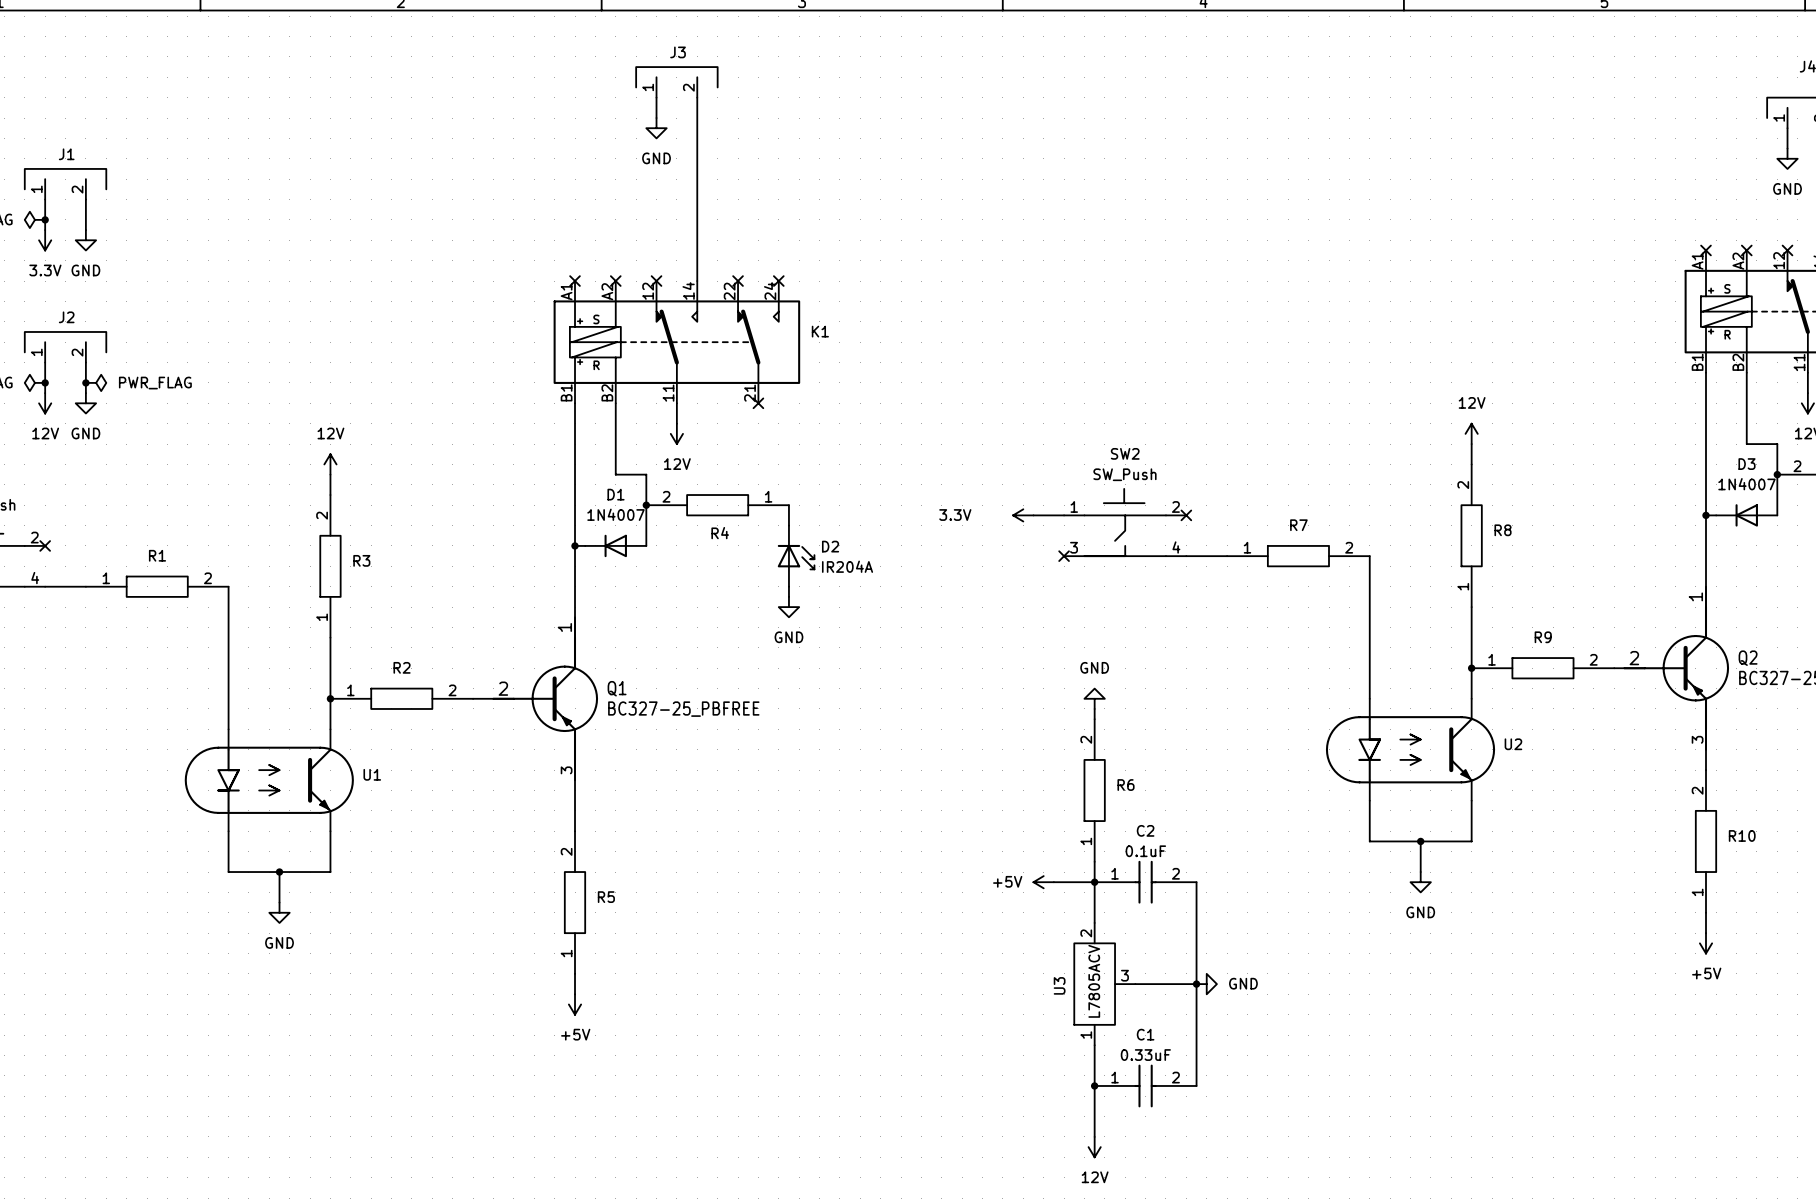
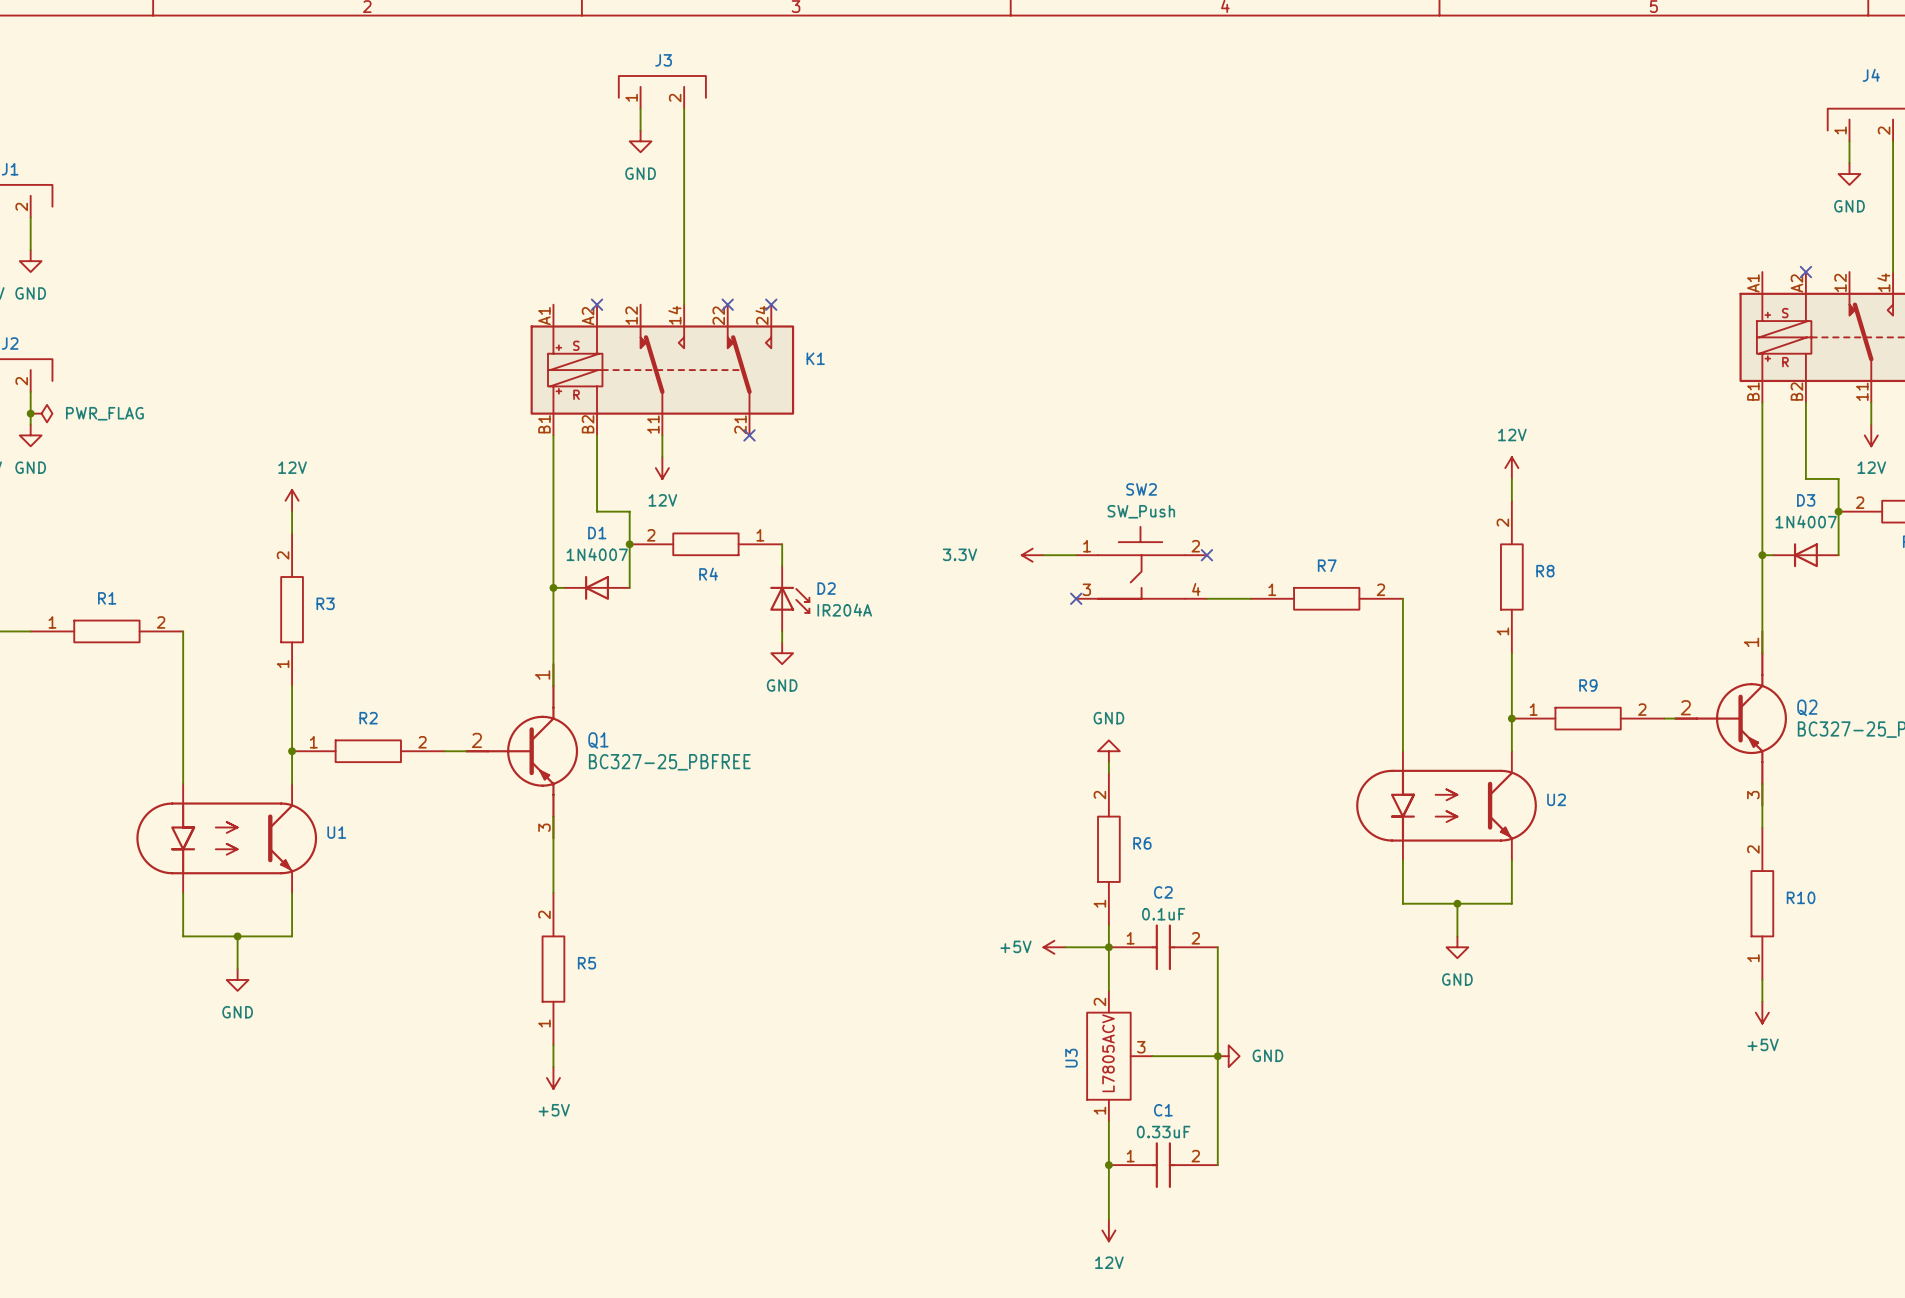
no-connect mark: (1706, 250) -> none
no-connect mark: (1787, 250) -> none
no-connect mark: (575, 281) -> none
no-connect mark: (656, 281) -> none

